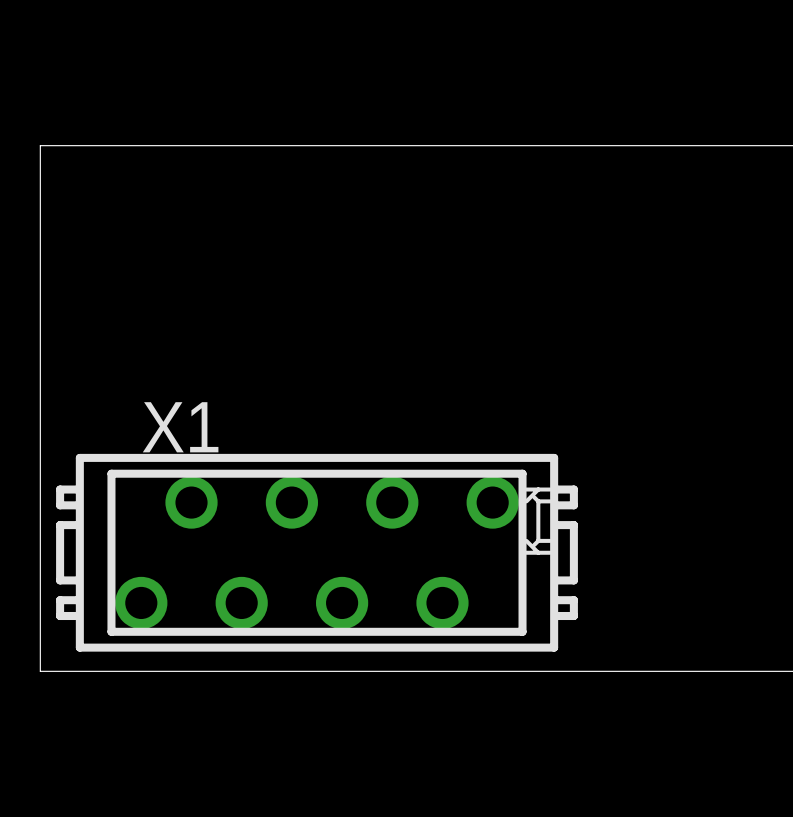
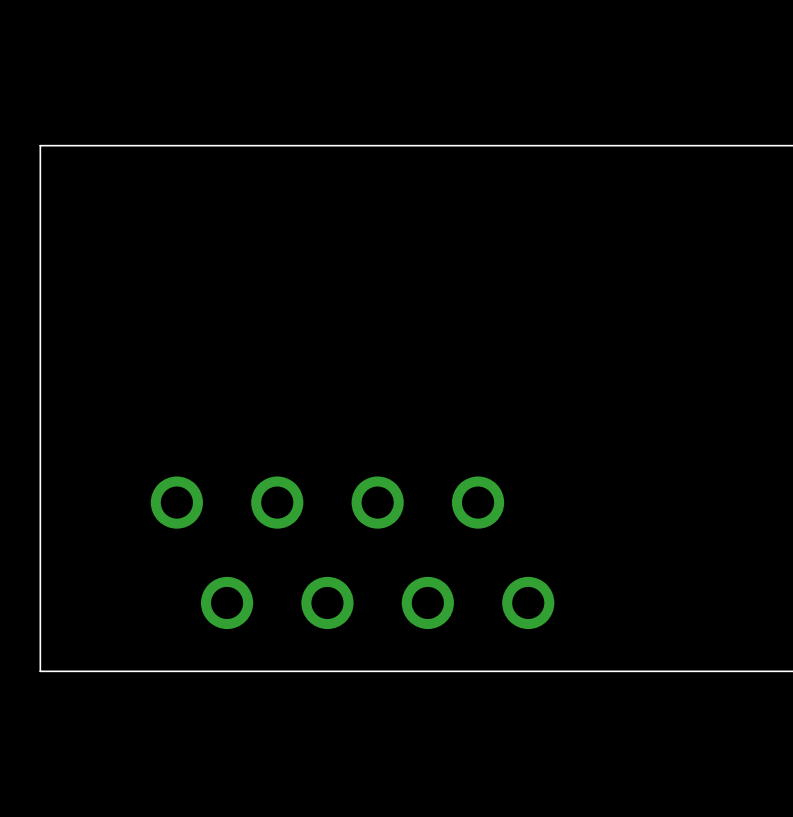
X1 side: bottom (316, 552) -> top (352, 552)

